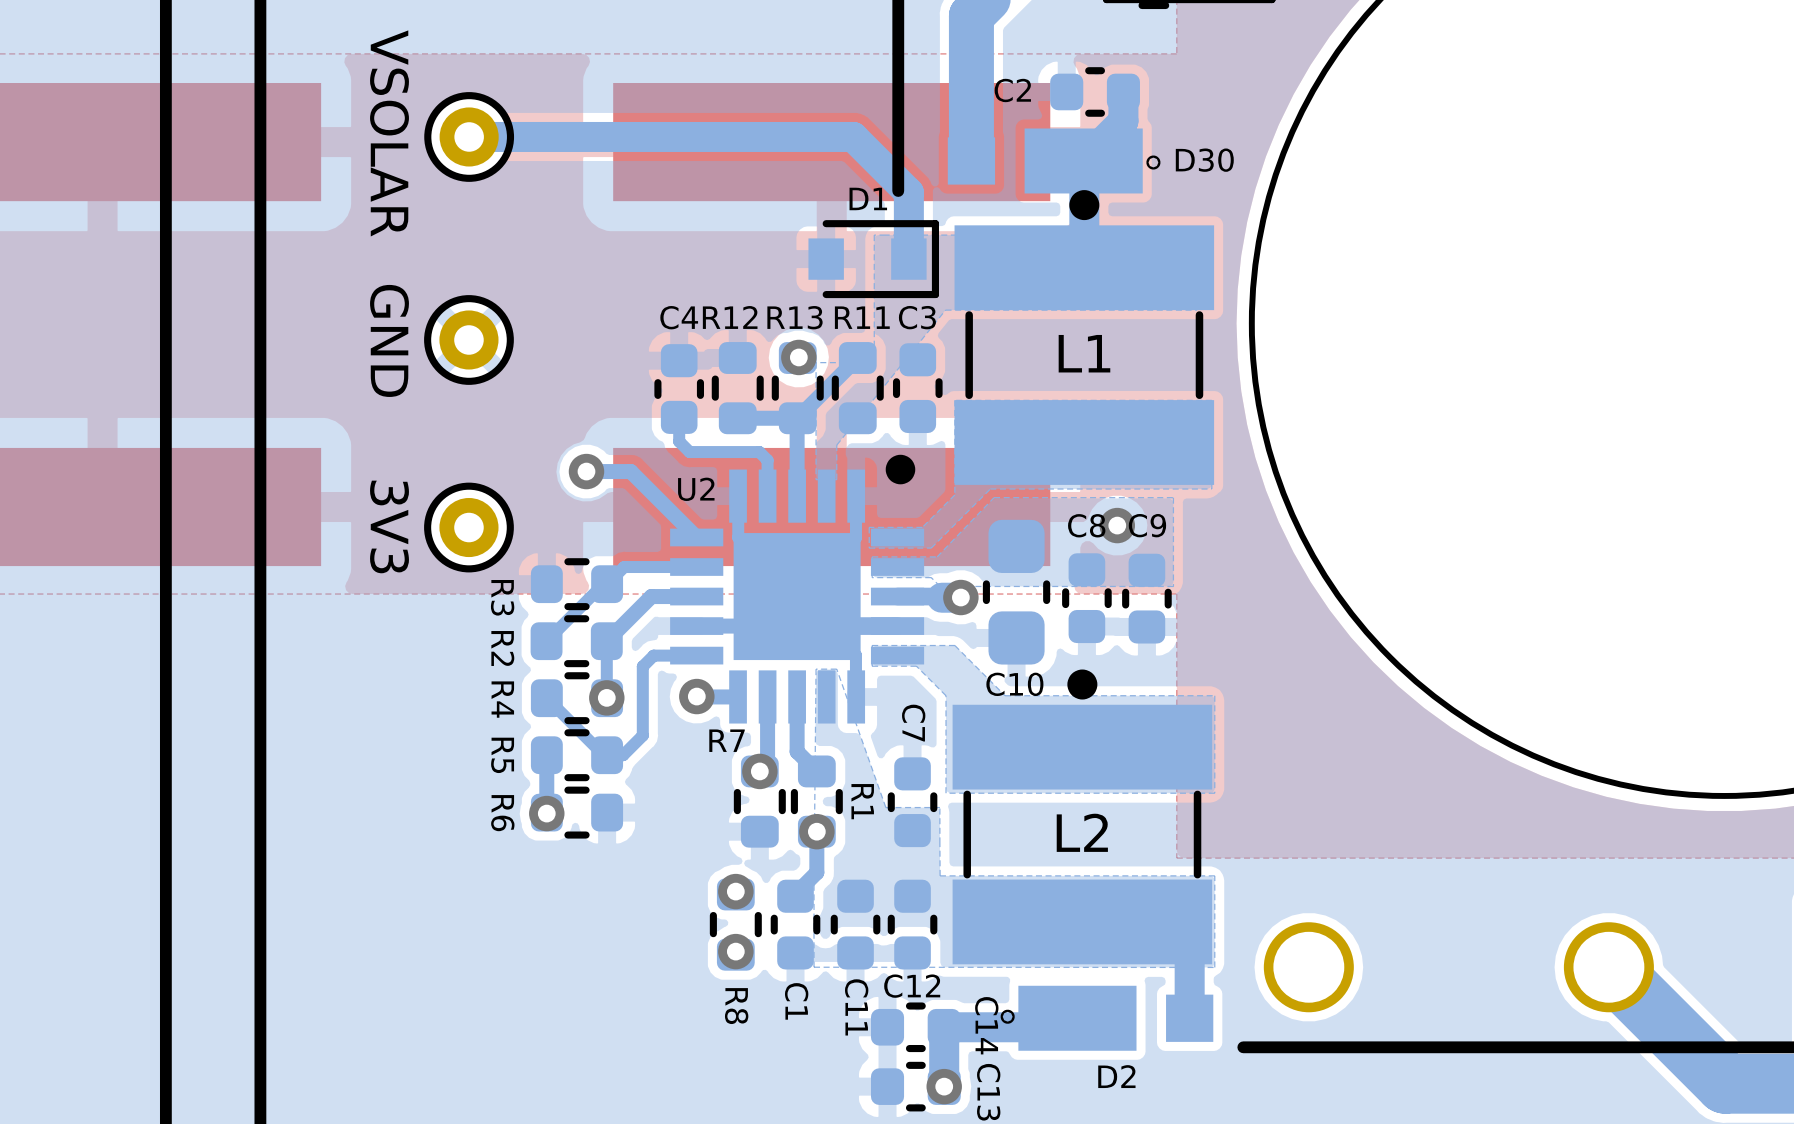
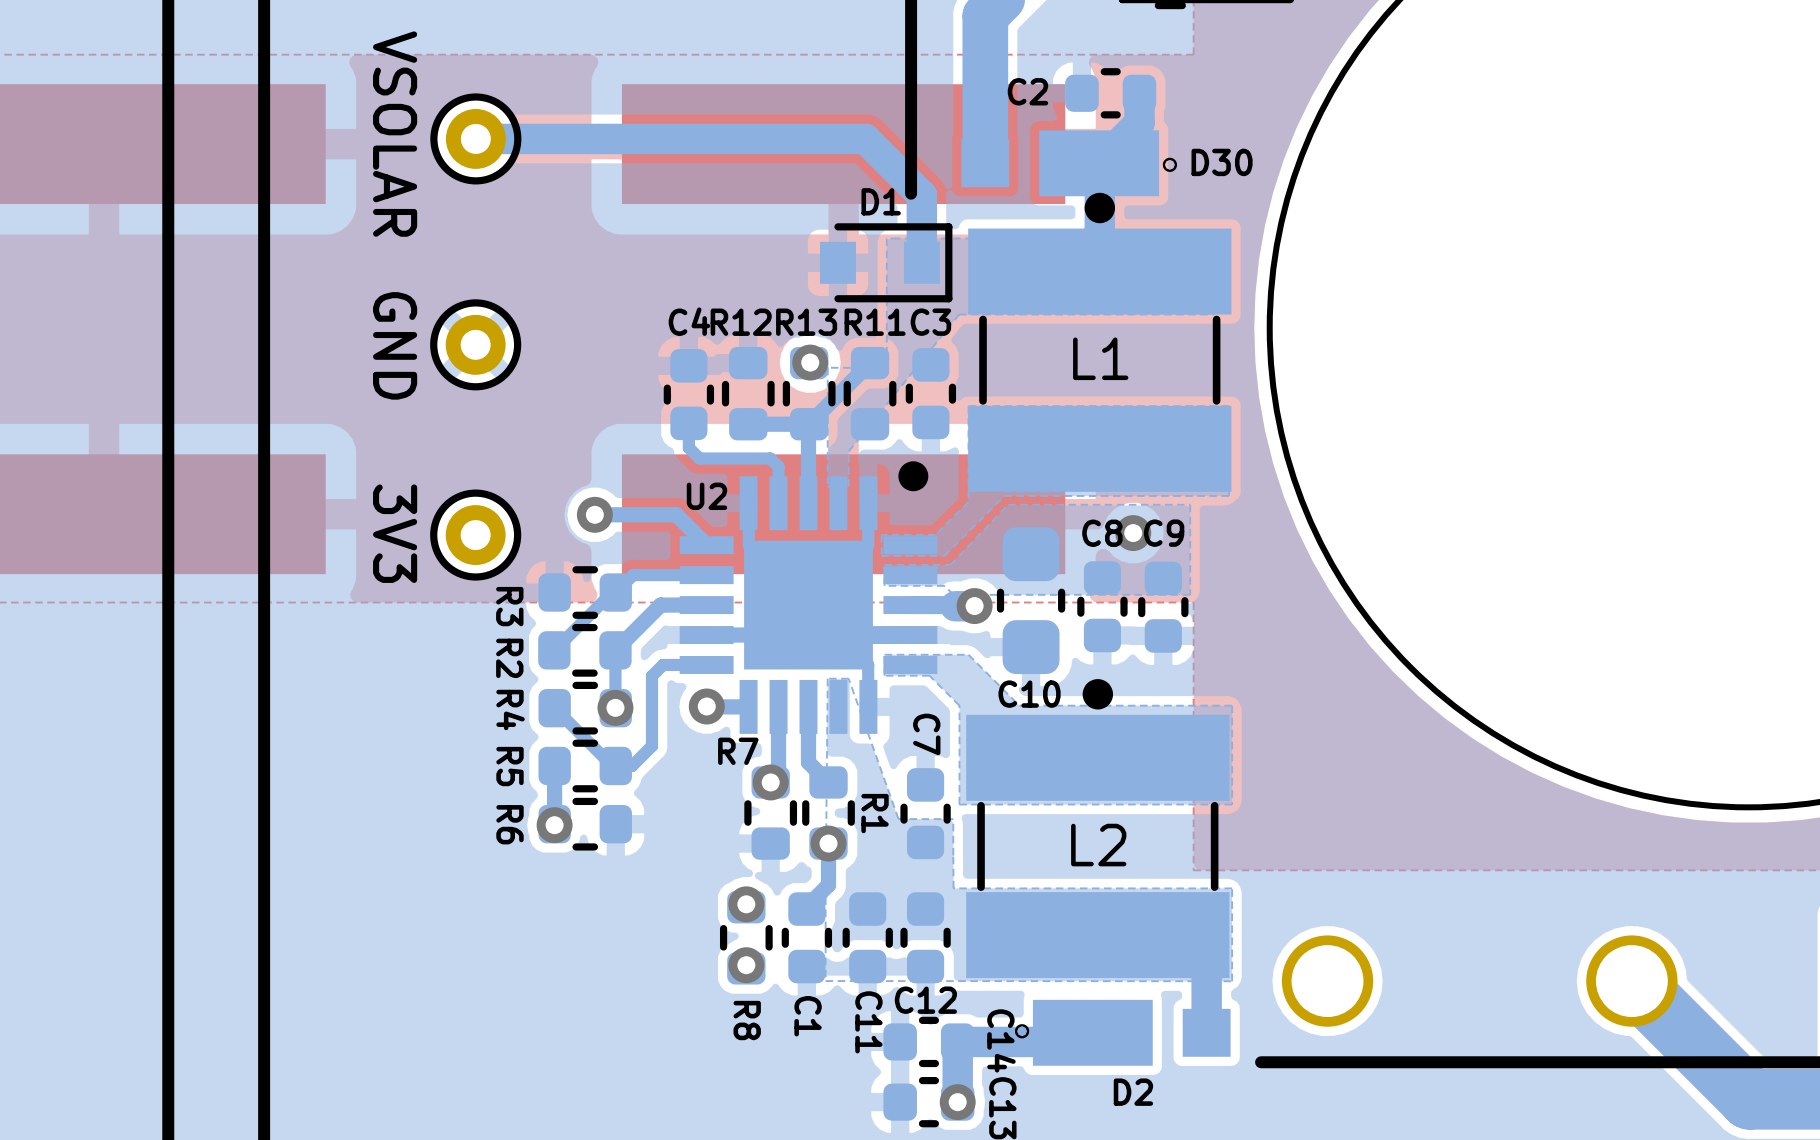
bottom track: (586, 471) (630, 471) (666, 507) -> (594, 514) (676, 514)
via position: (586, 471) -> (594, 514)

